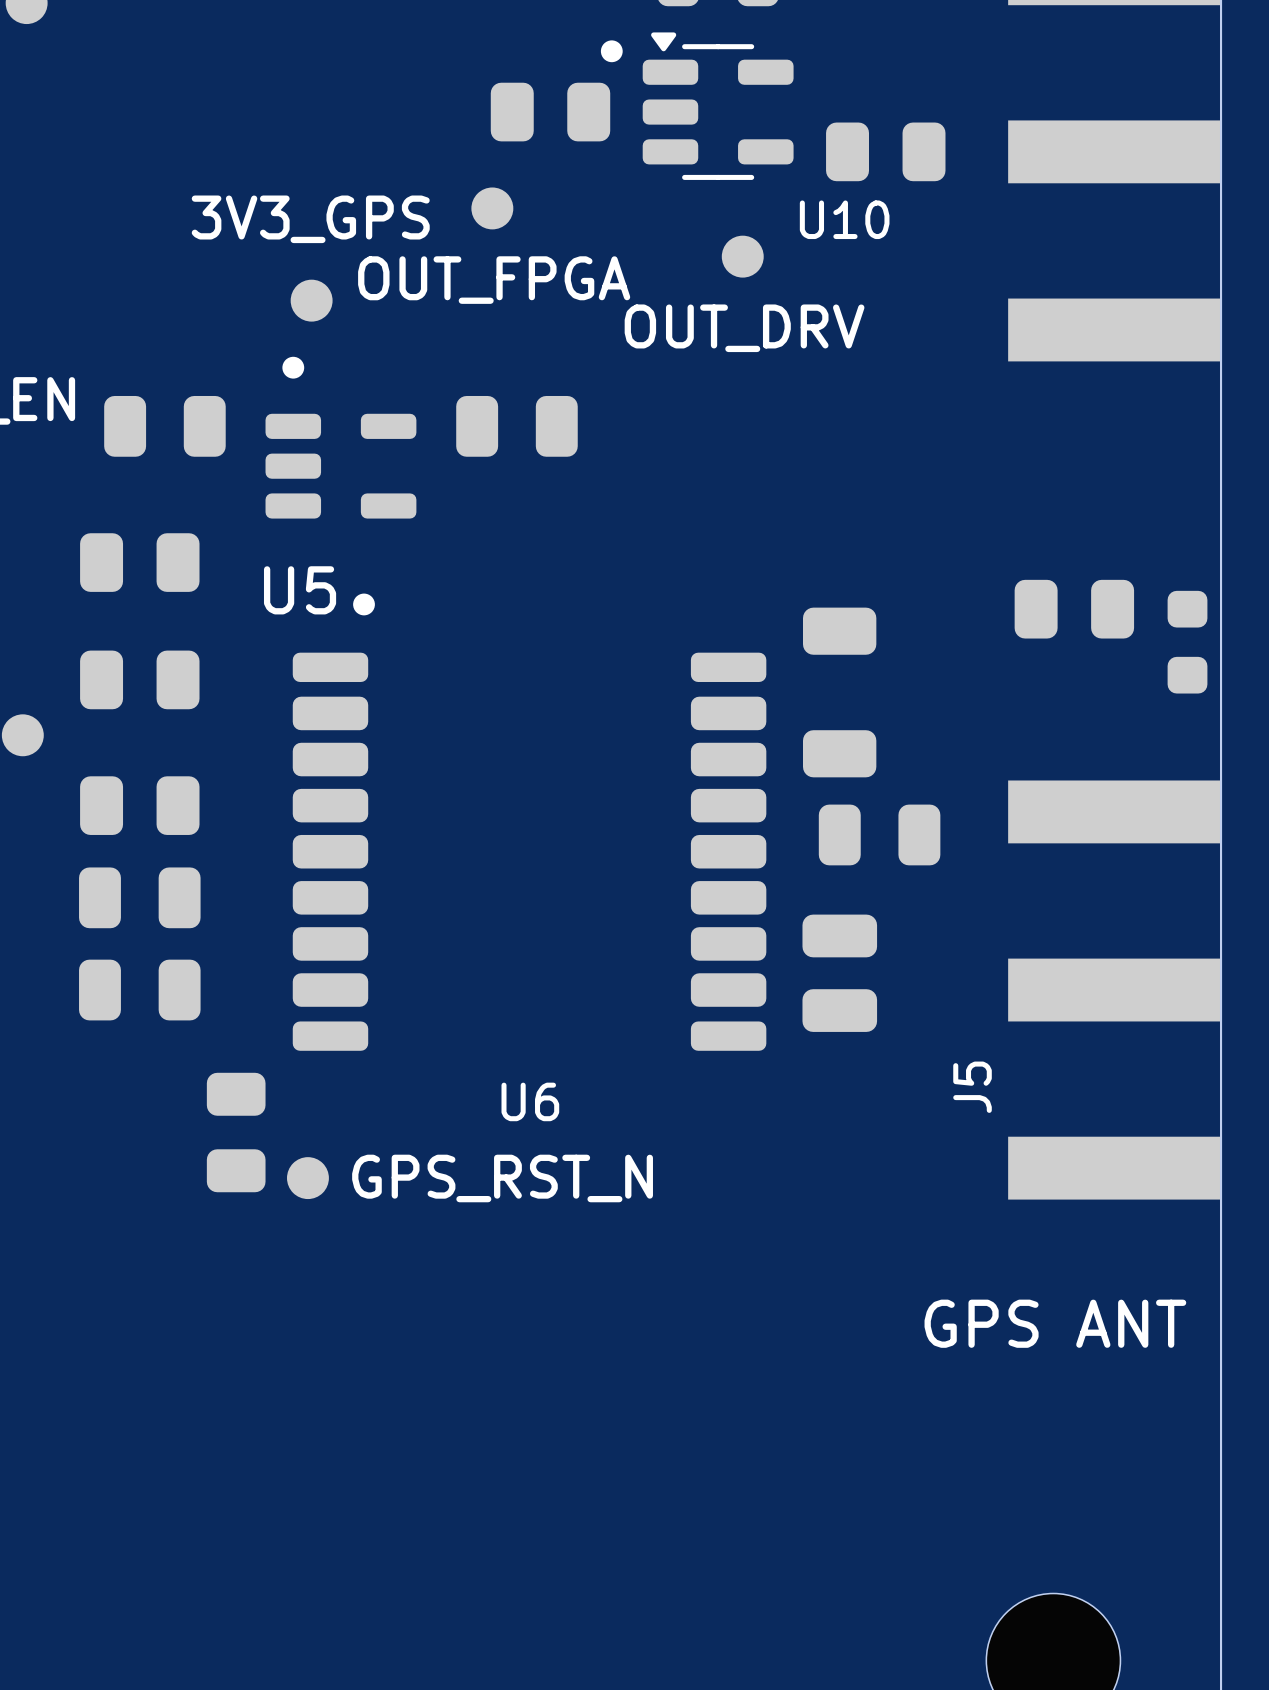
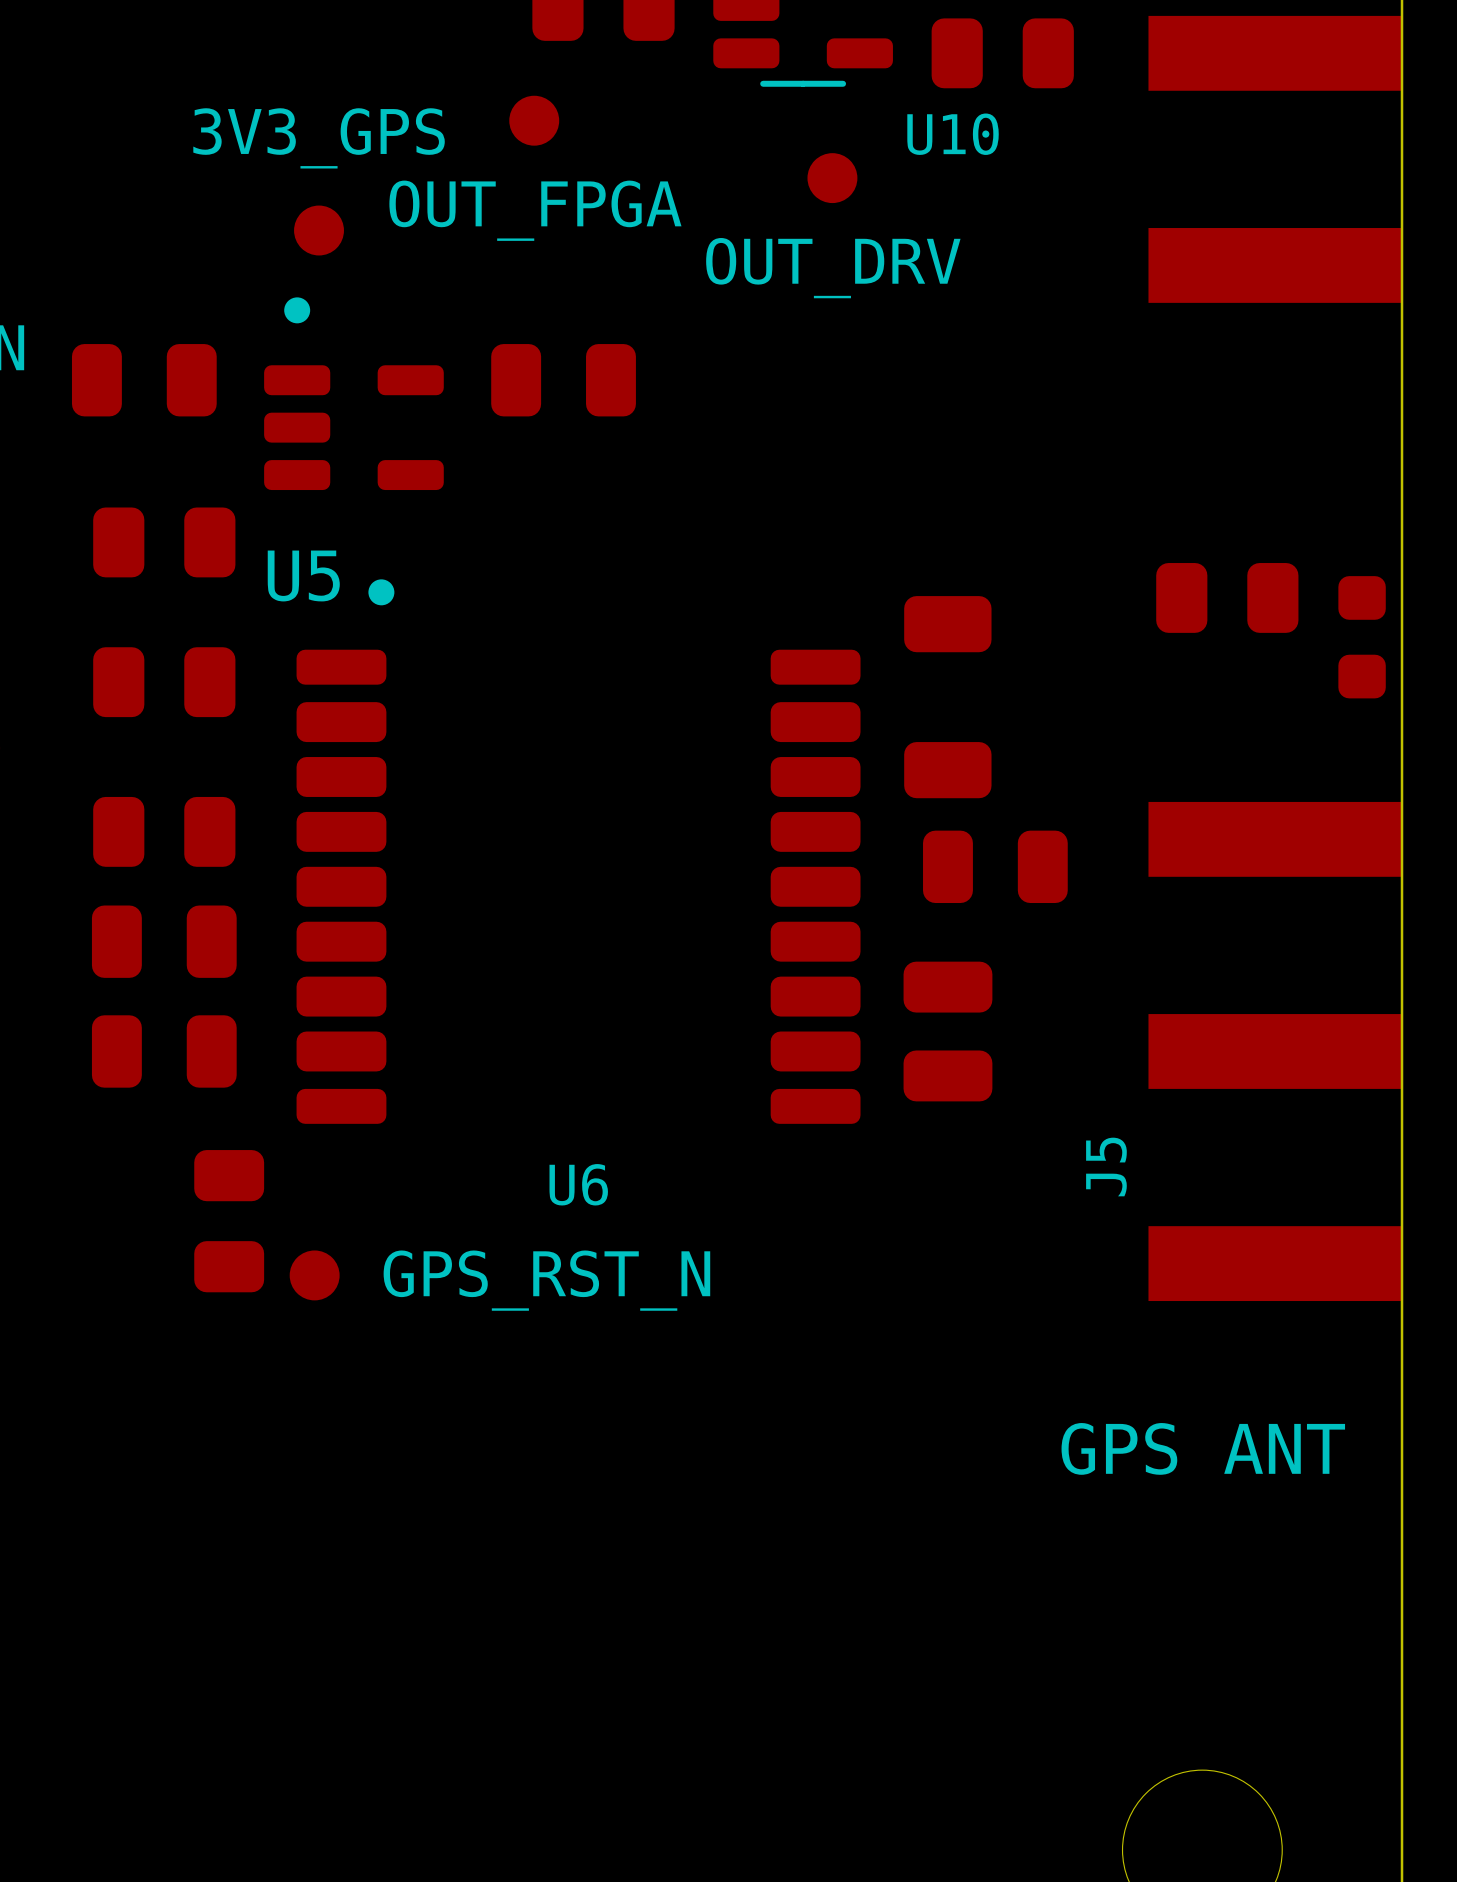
part position: (139, 562) -> (164, 542)
part position: (139, 679) -> (164, 682)
part position: (139, 805) -> (164, 831)
part position: (139, 897) -> (164, 941)
part position: (139, 990) -> (164, 1051)

